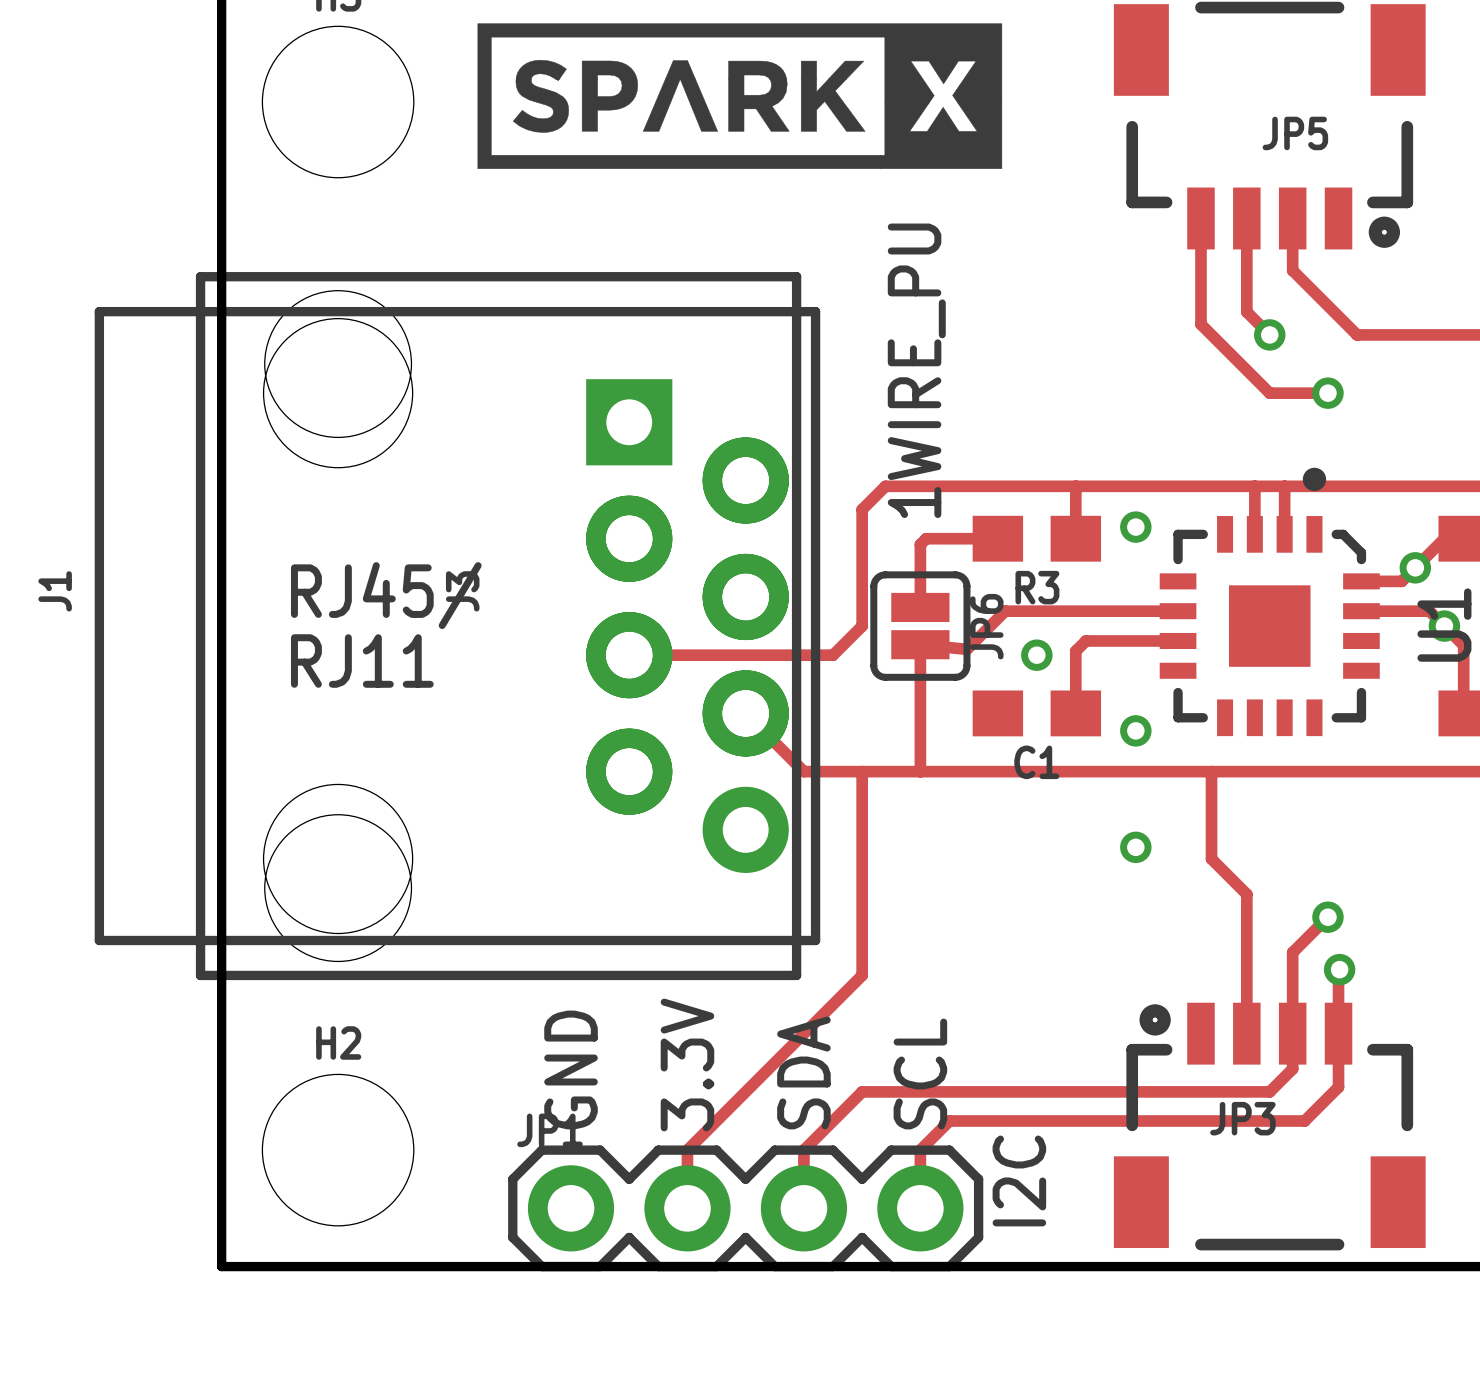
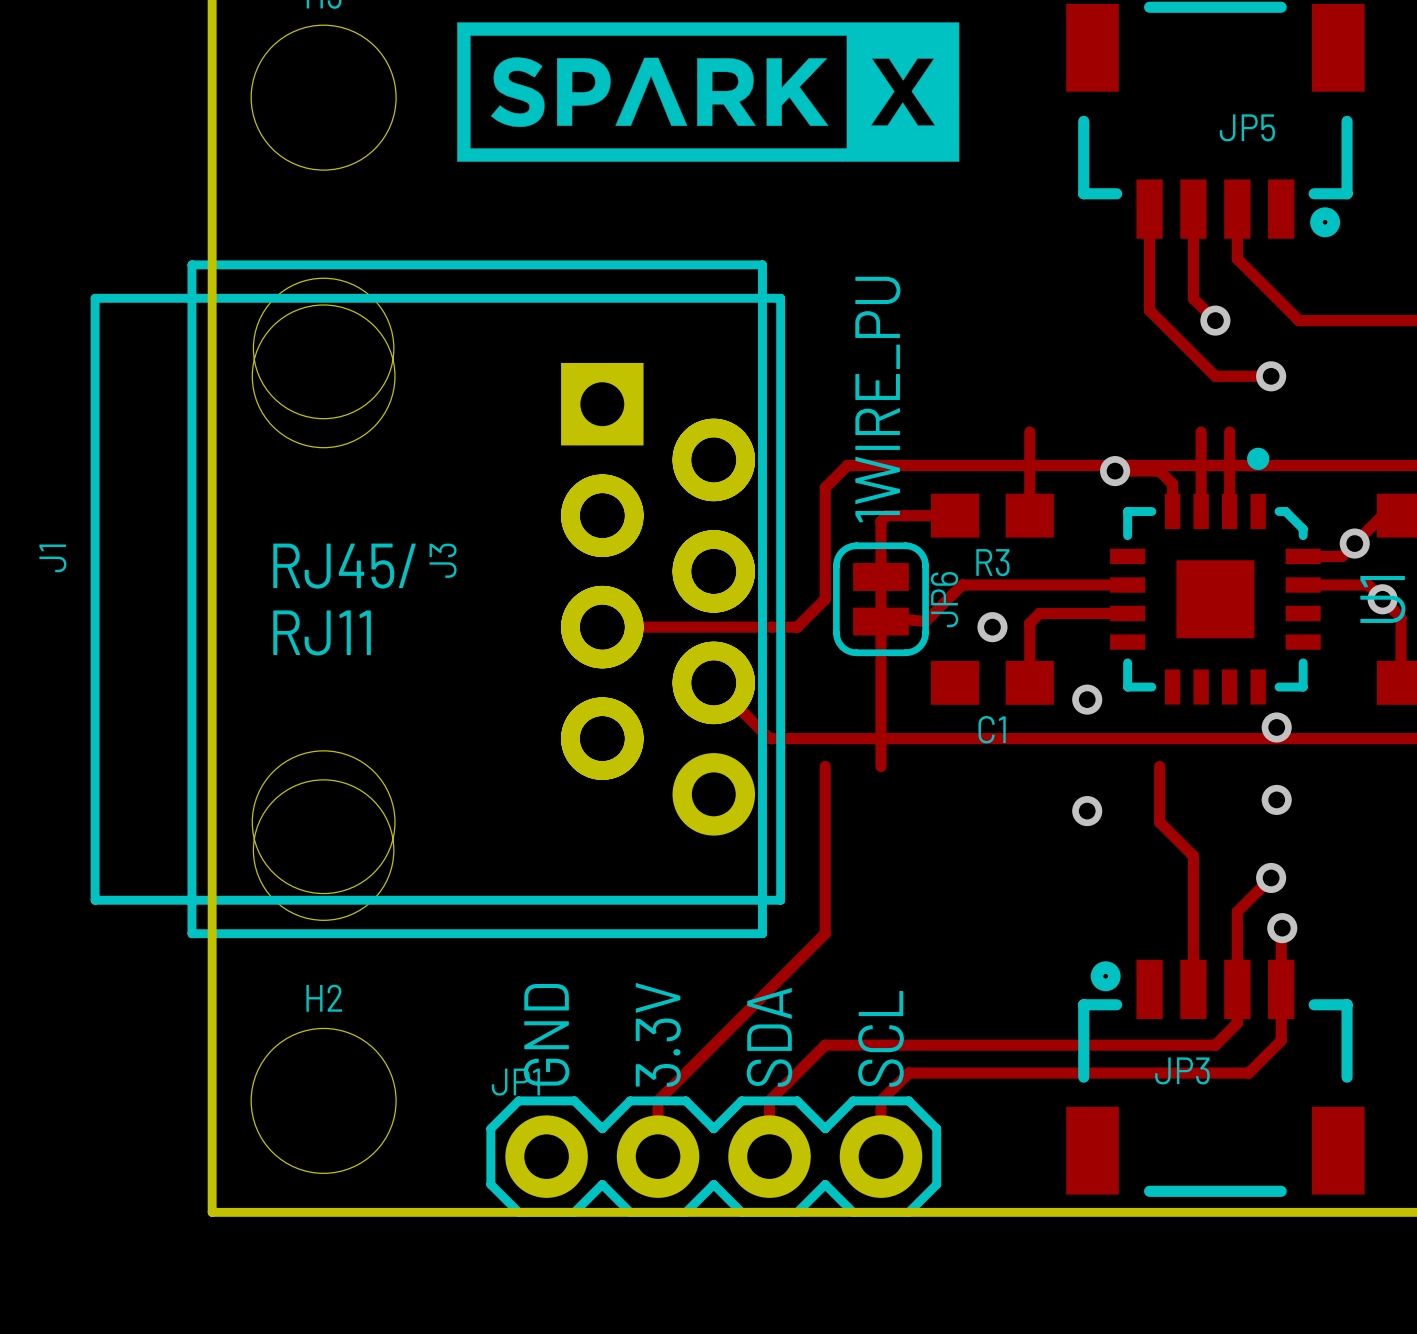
text position: 1WIRE_PU (916, 370) -> 1WIRE_PU (877, 399)
track: none -> (1029, 432) (1029, 465)
track: none -> (1201, 432) (1201, 465)
track: none -> (1229, 432) (1229, 465)
track: none -> (1115, 471) (1159, 471) (1172, 484) (1172, 511)
via position: (1135, 527) -> (1115, 471)
JP6 footprint: [870, 571, 971, 681] -> [833, 542, 929, 657]
via: none -> (1276, 727)
track: (862, 771) (862, 800) -> (880, 738) (880, 766)
track: (1211, 771) (1211, 800) -> none
via: none -> (1276, 799)
text: I2C (1019, 1180) -> none

